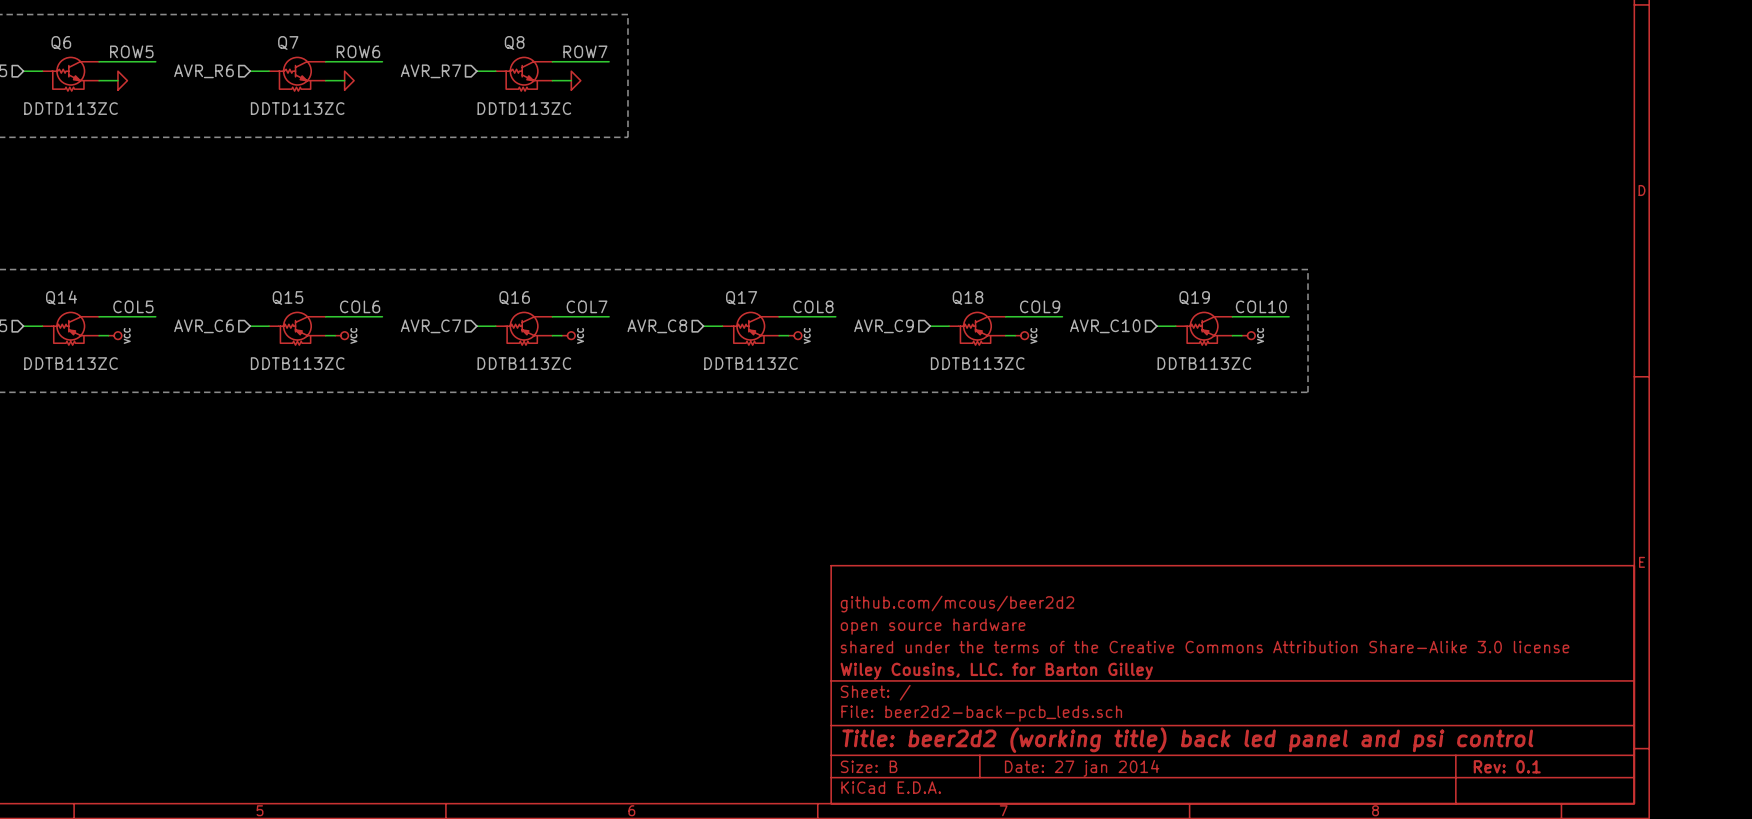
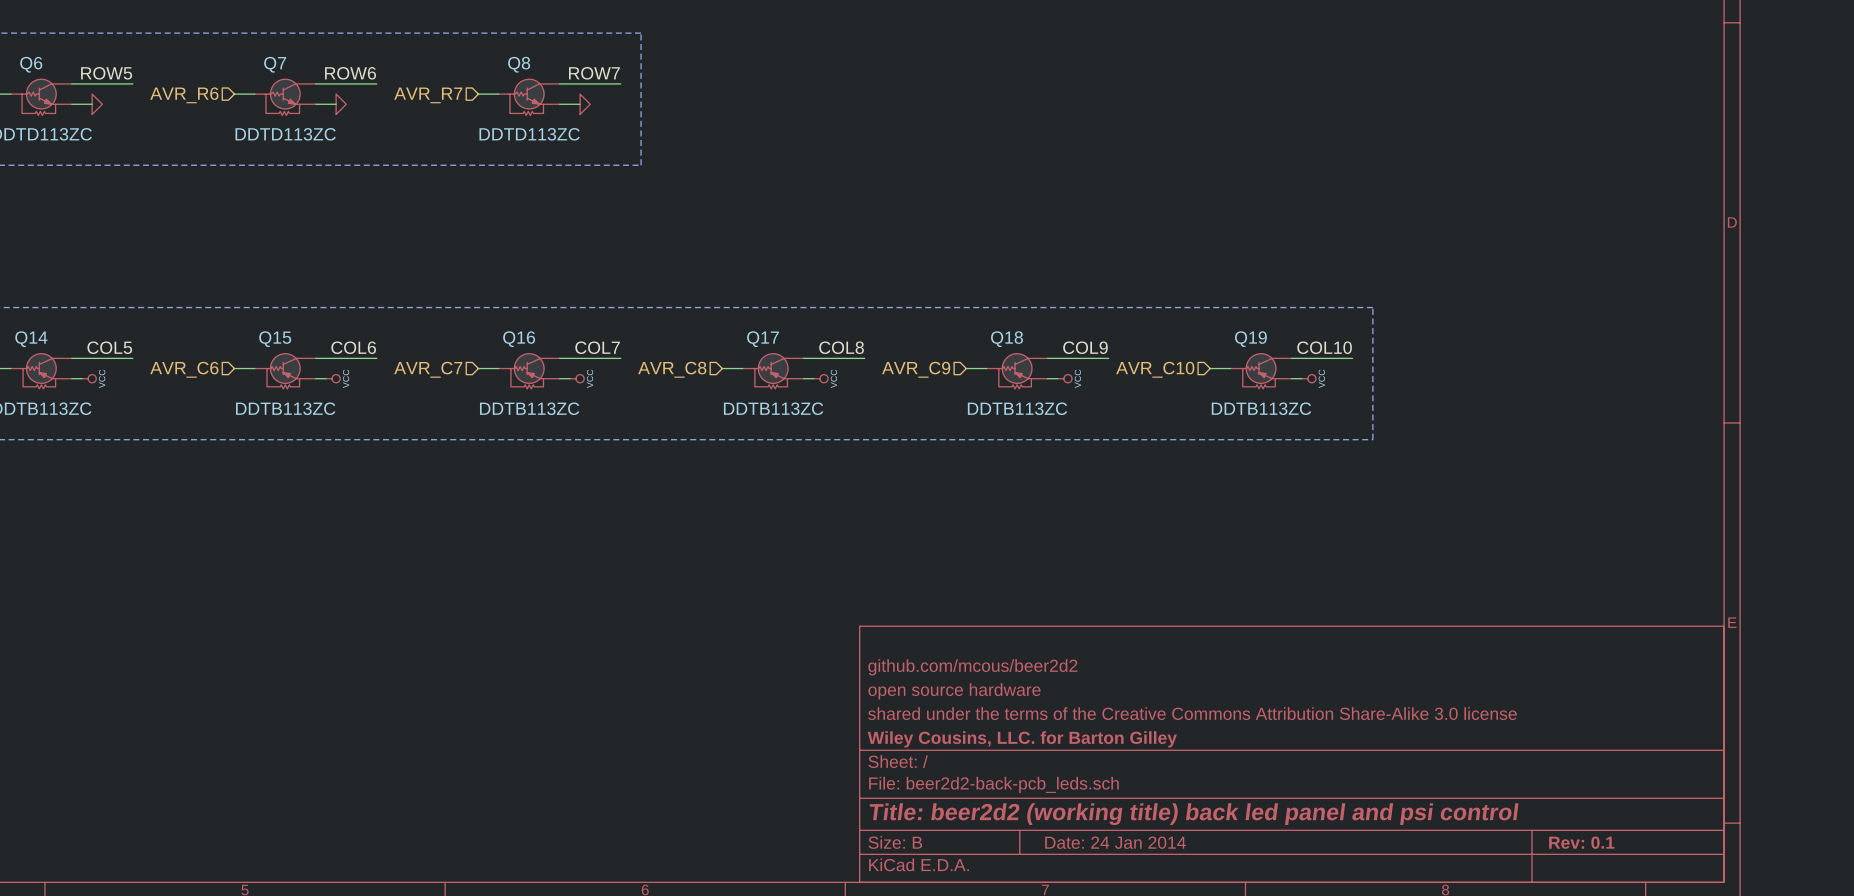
title block: Date: 27 jan 2014 (1082, 768) -> Date: 24 Jan 2014 (1115, 842)

